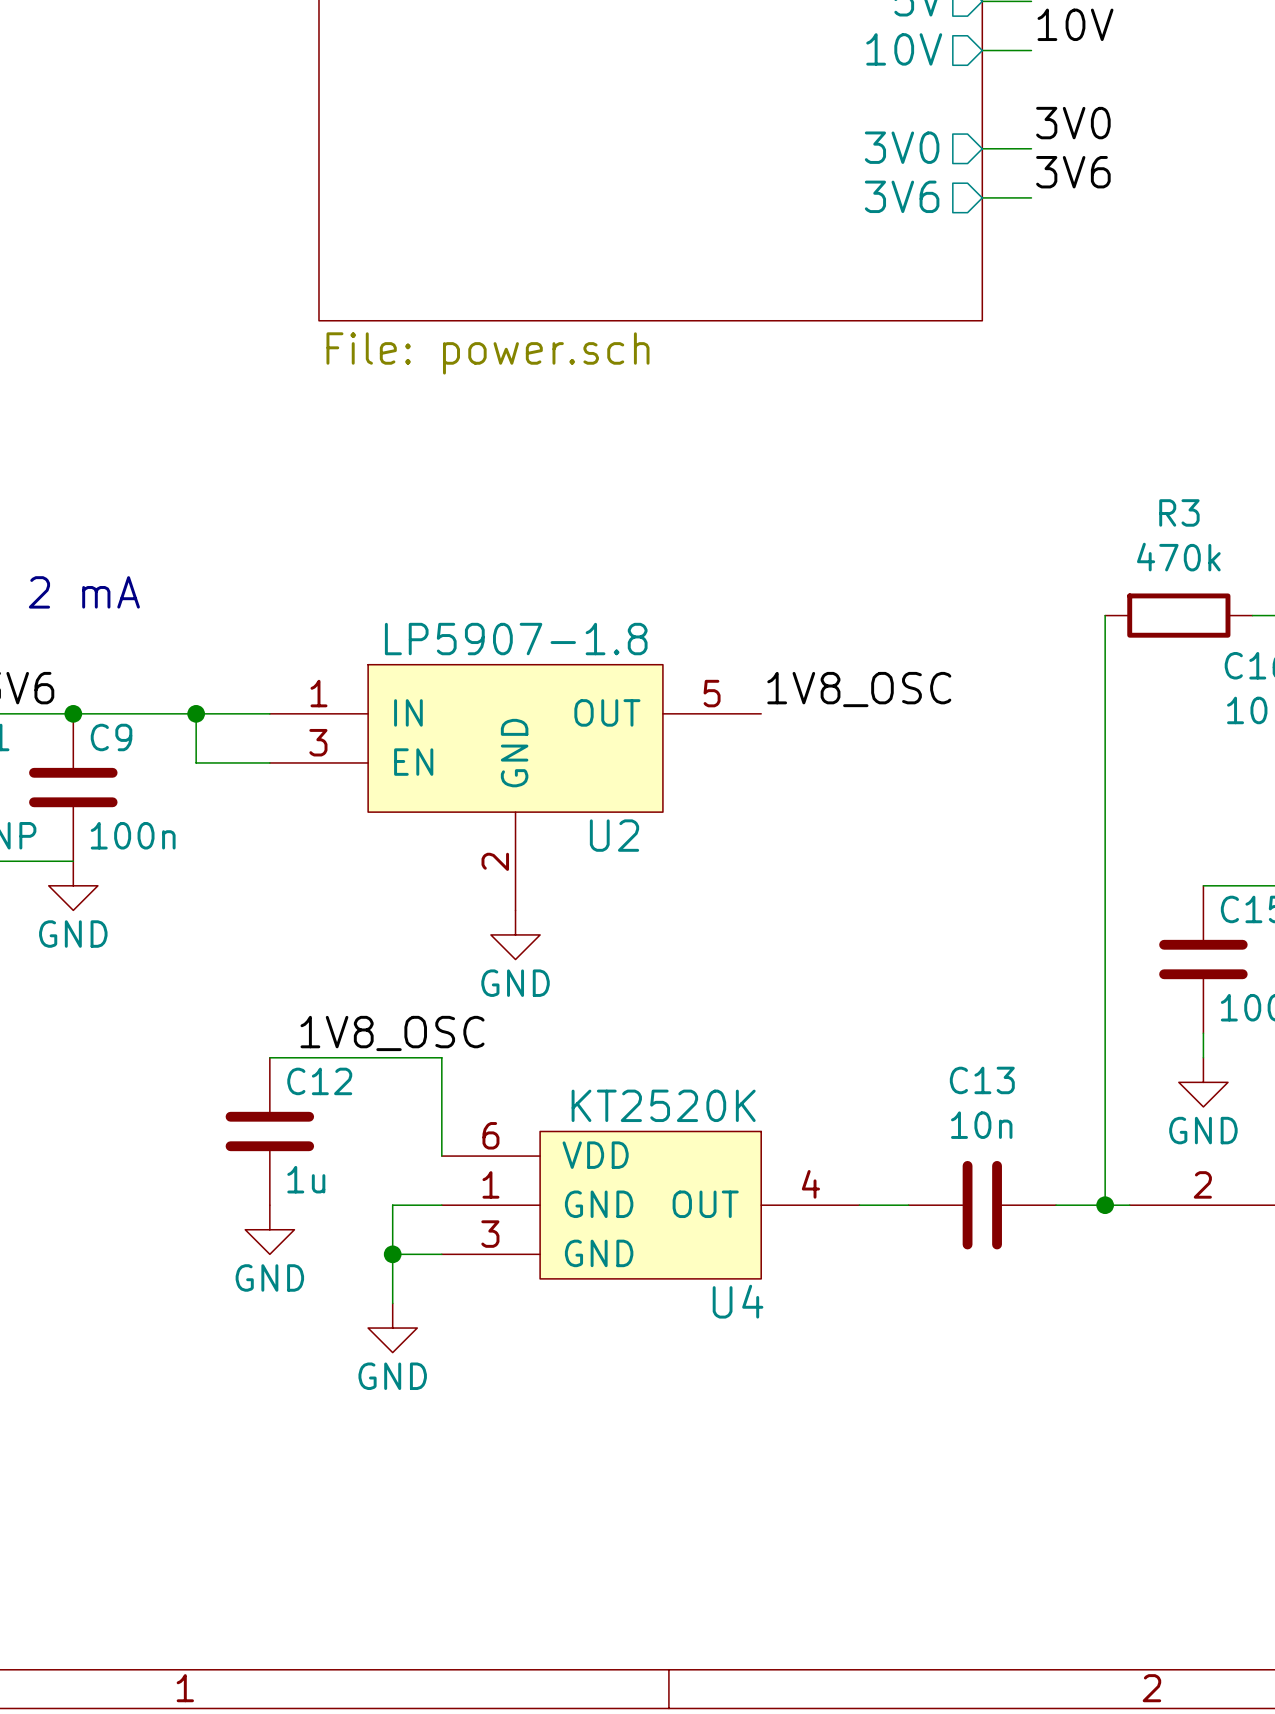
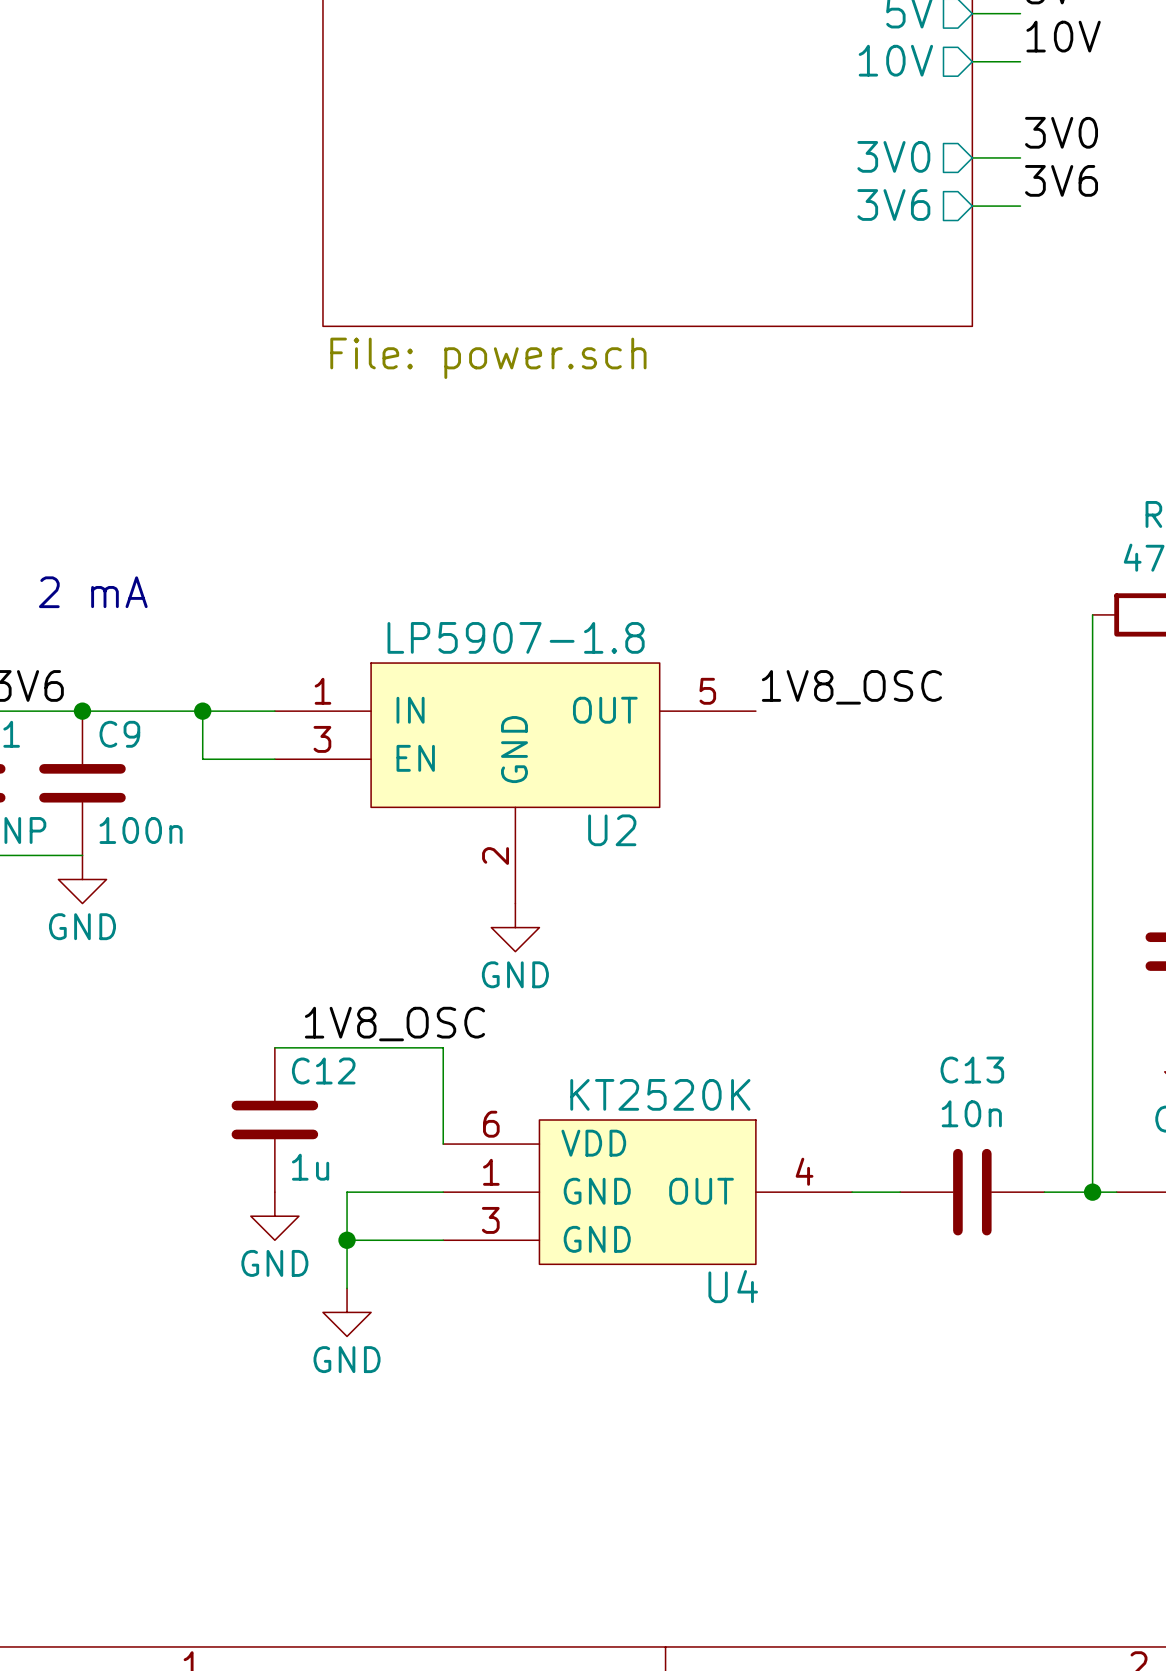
wire: (392, 1205) (392, 1303) -> (395, 1192) (347, 1192) (347, 1288)
wire: none -> (347, 1240) (395, 1240)
junction position: (392, 1254) -> (347, 1240)
power symbol position: GND (392, 1328) -> GND (347, 1312)

